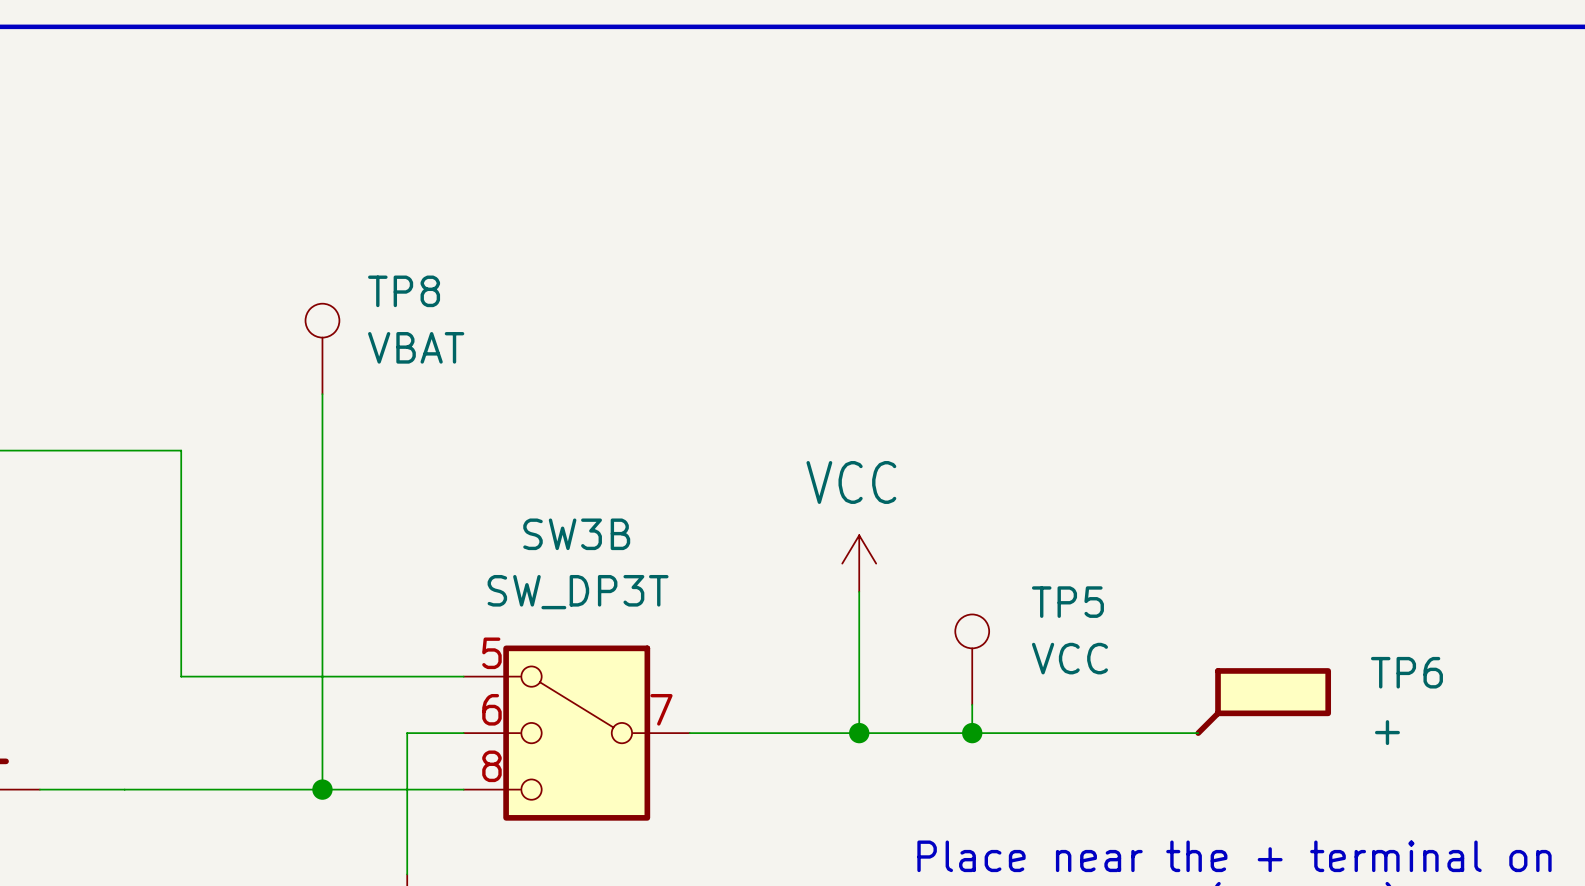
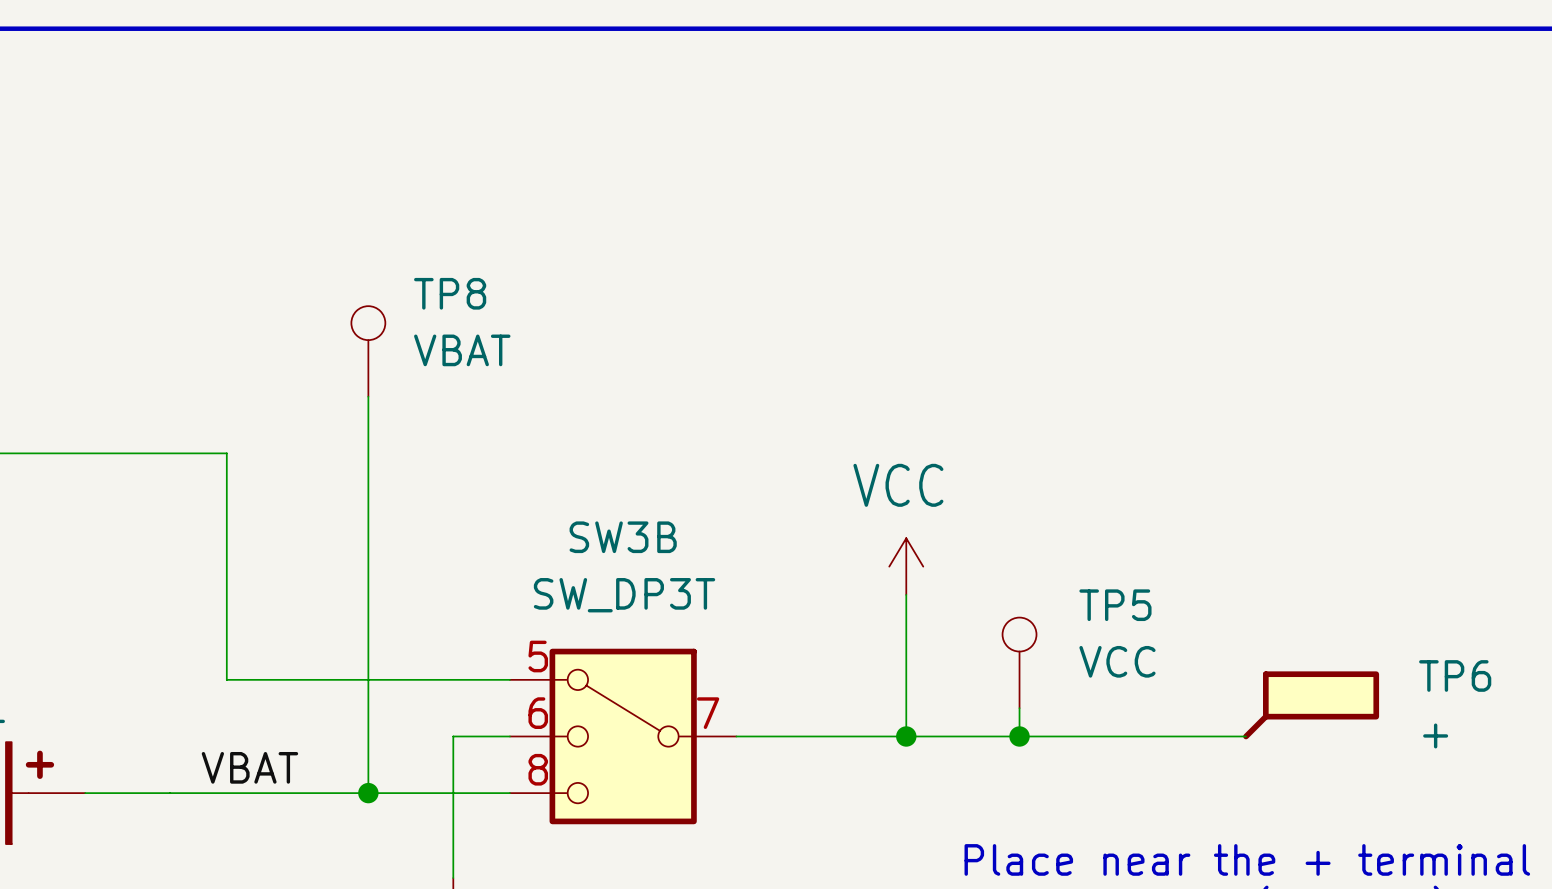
label: none -> VBAT (249, 767)

